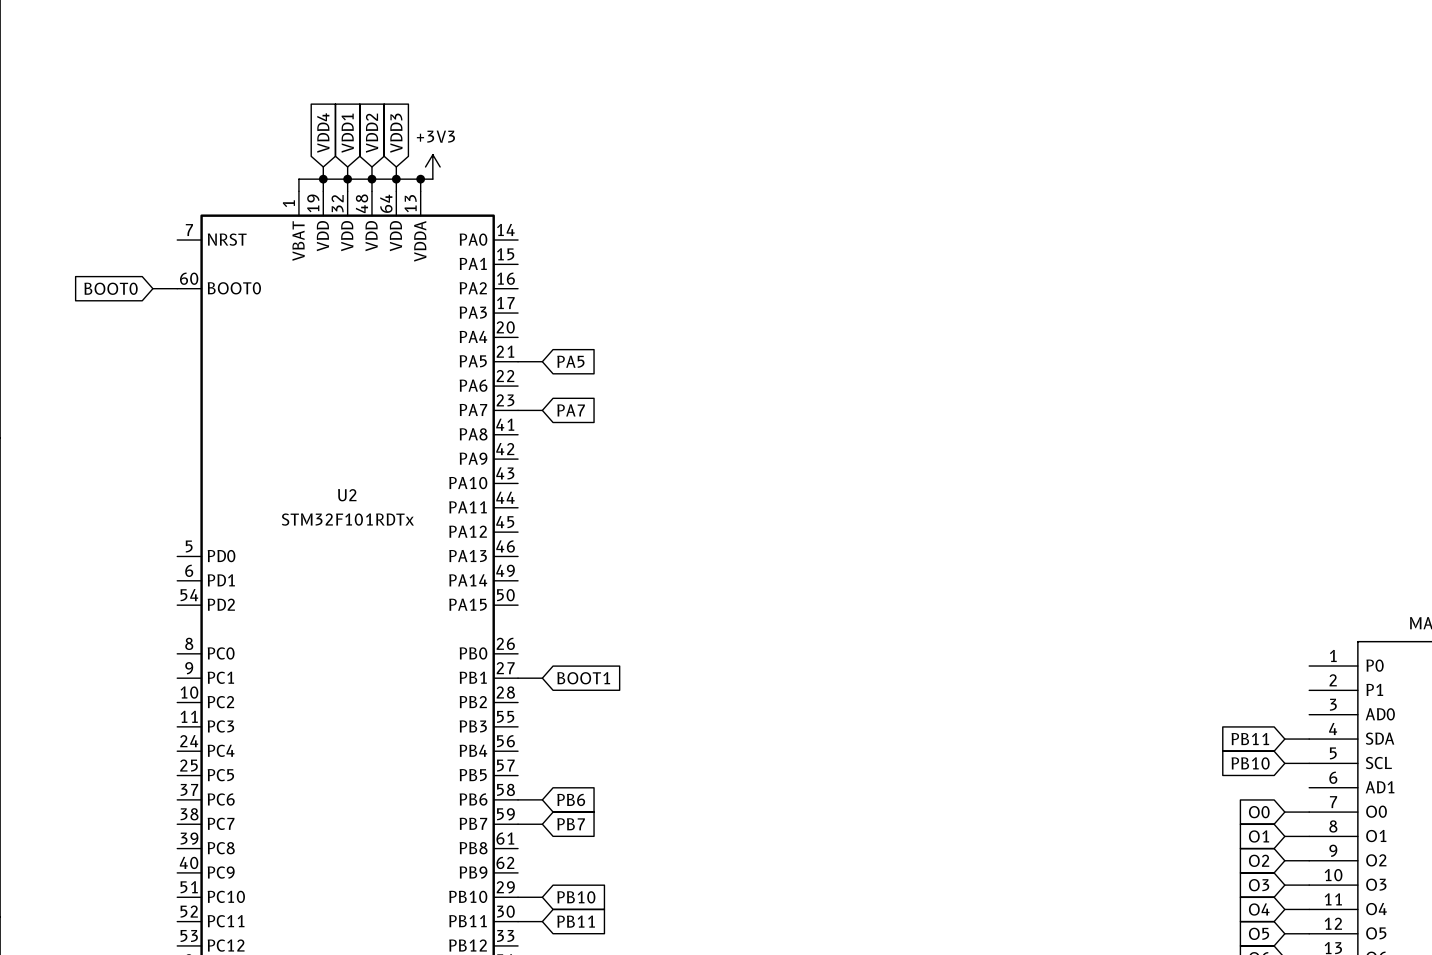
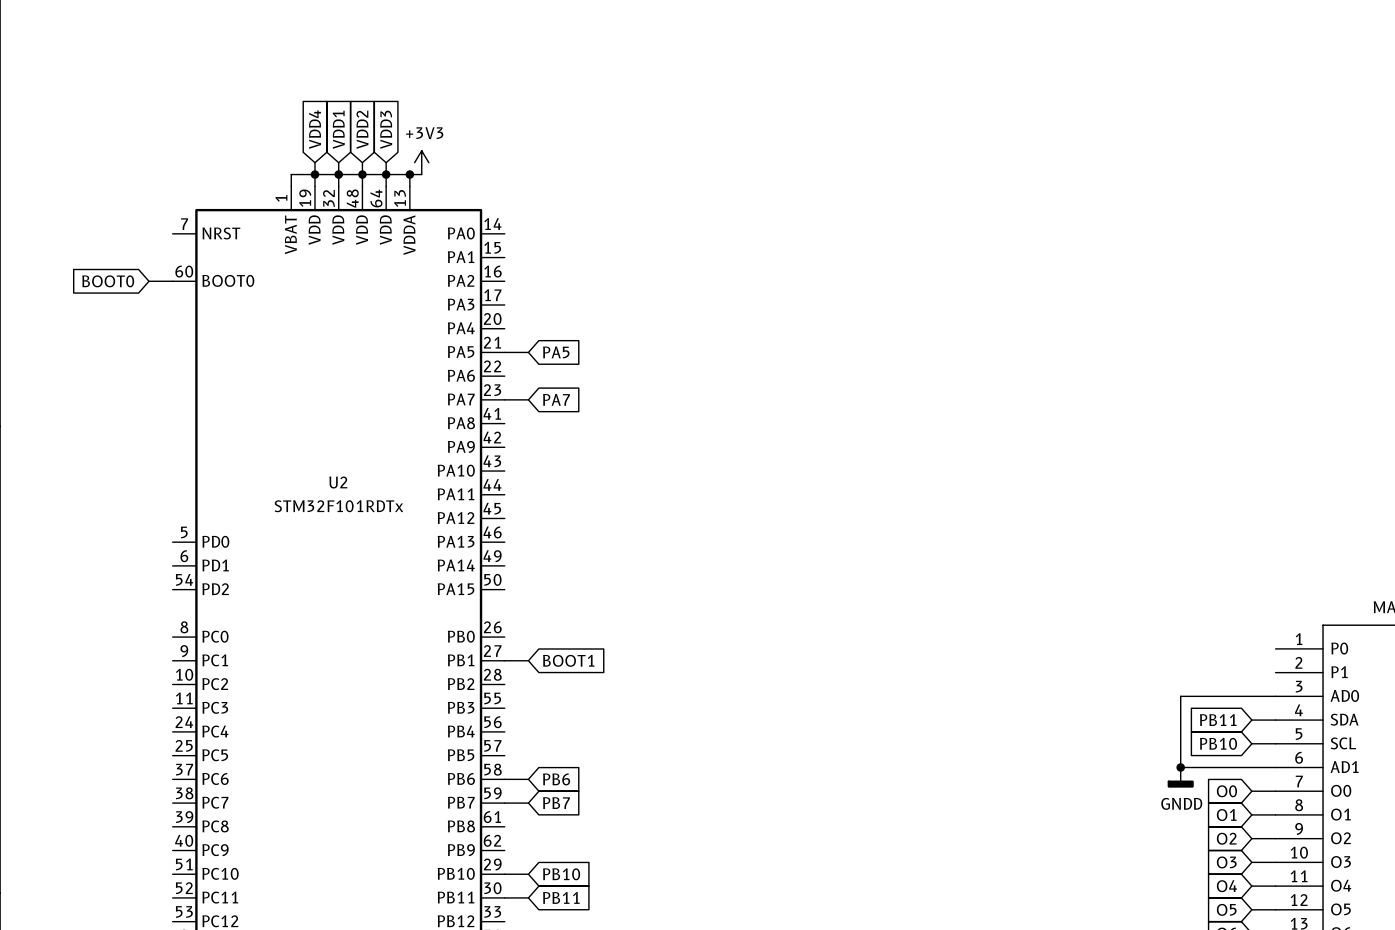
wire: none -> (1275, 696) (1180, 696) (1180, 767) (1275, 767)
junction: none -> (1180, 767)
power symbol: none -> GNDD (1180, 777)

